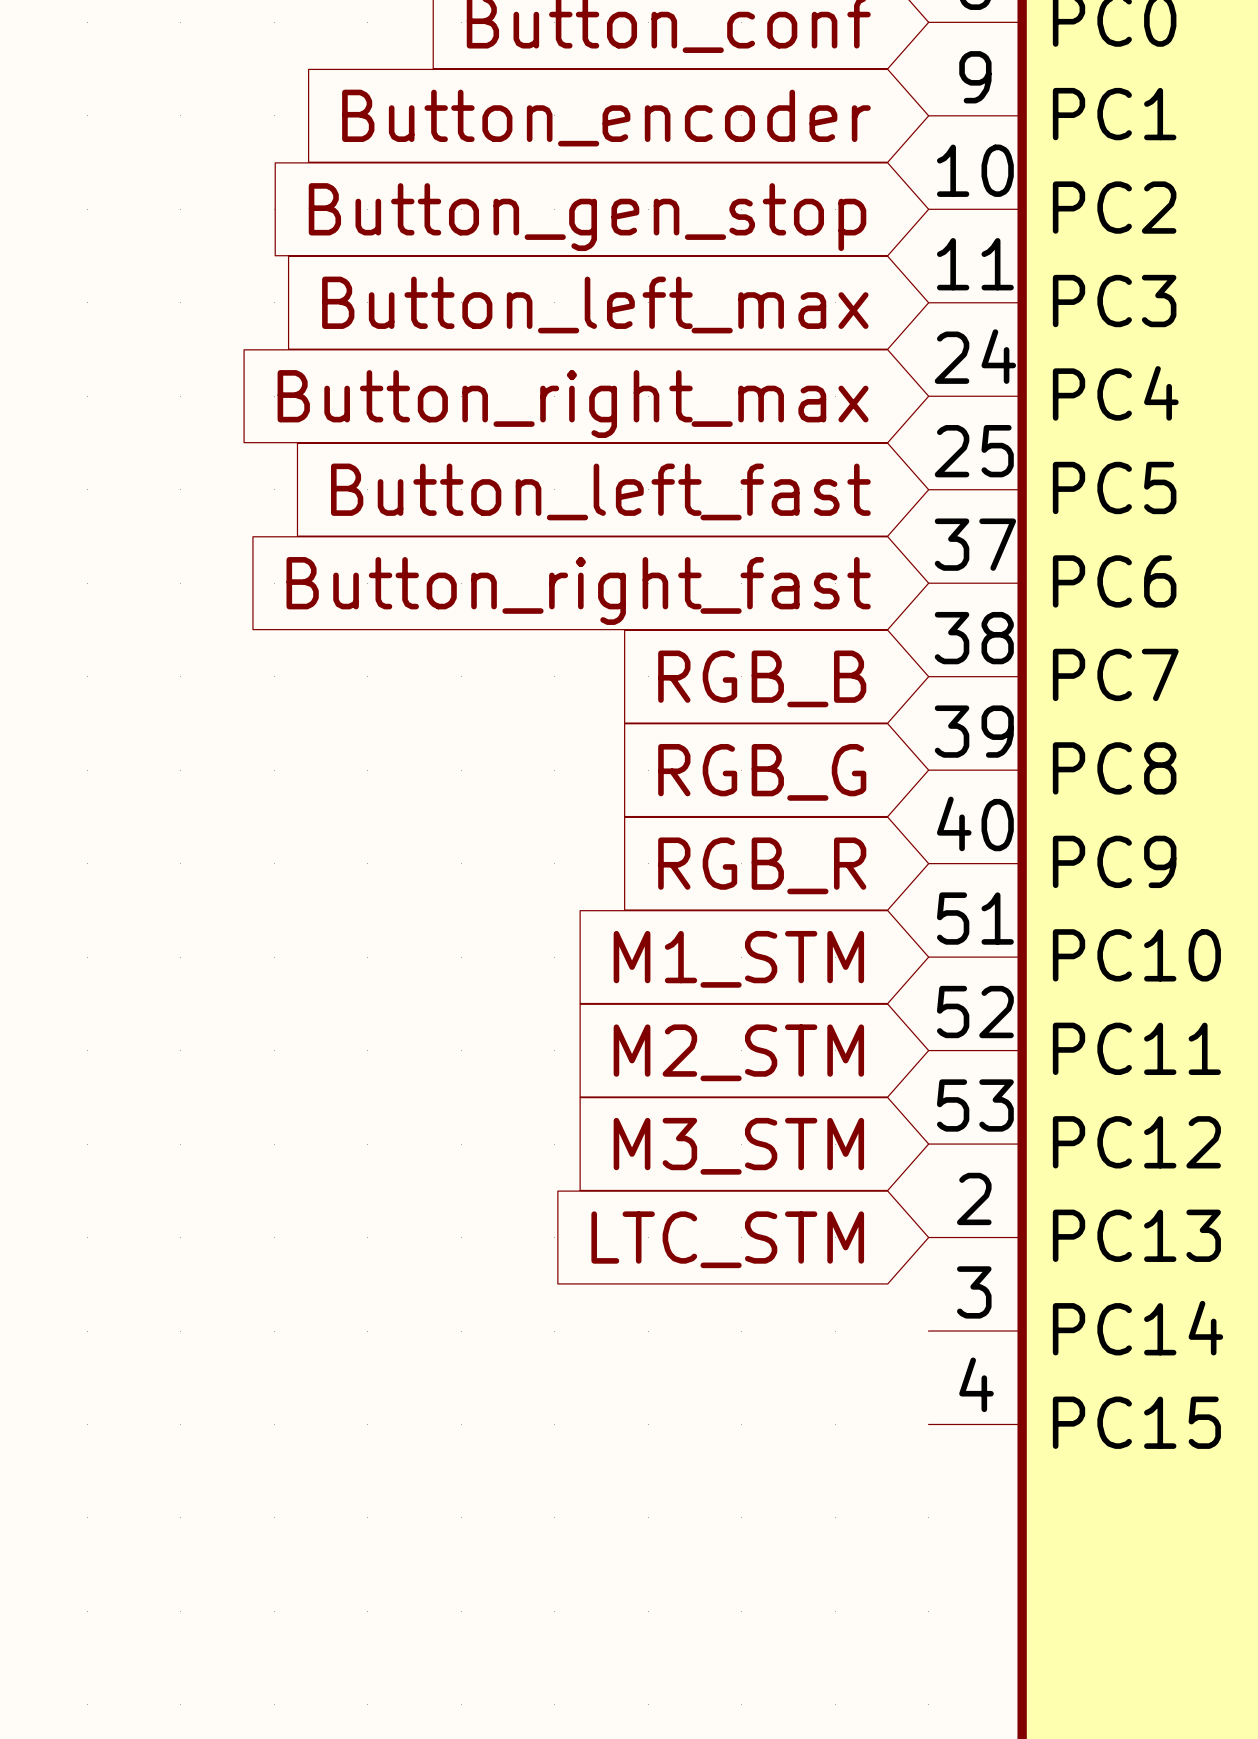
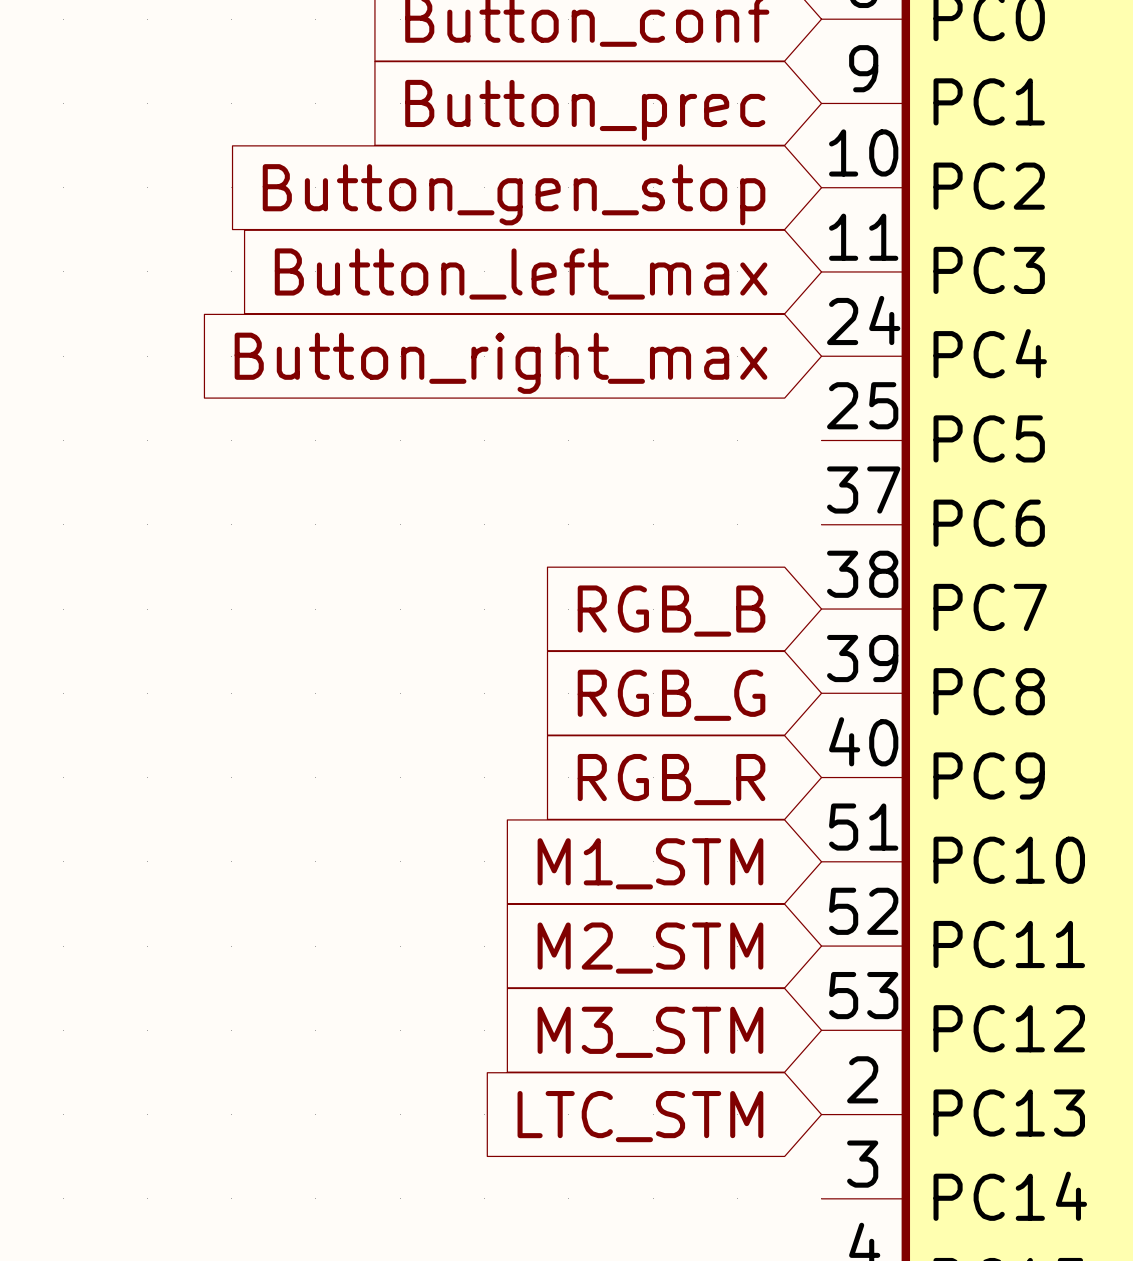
global label: Button_encoder (606, 118) -> Button_prec (585, 110)
global label: Button_left_fast (600, 491) -> none
global label: Button_right_fast (578, 590) -> none

